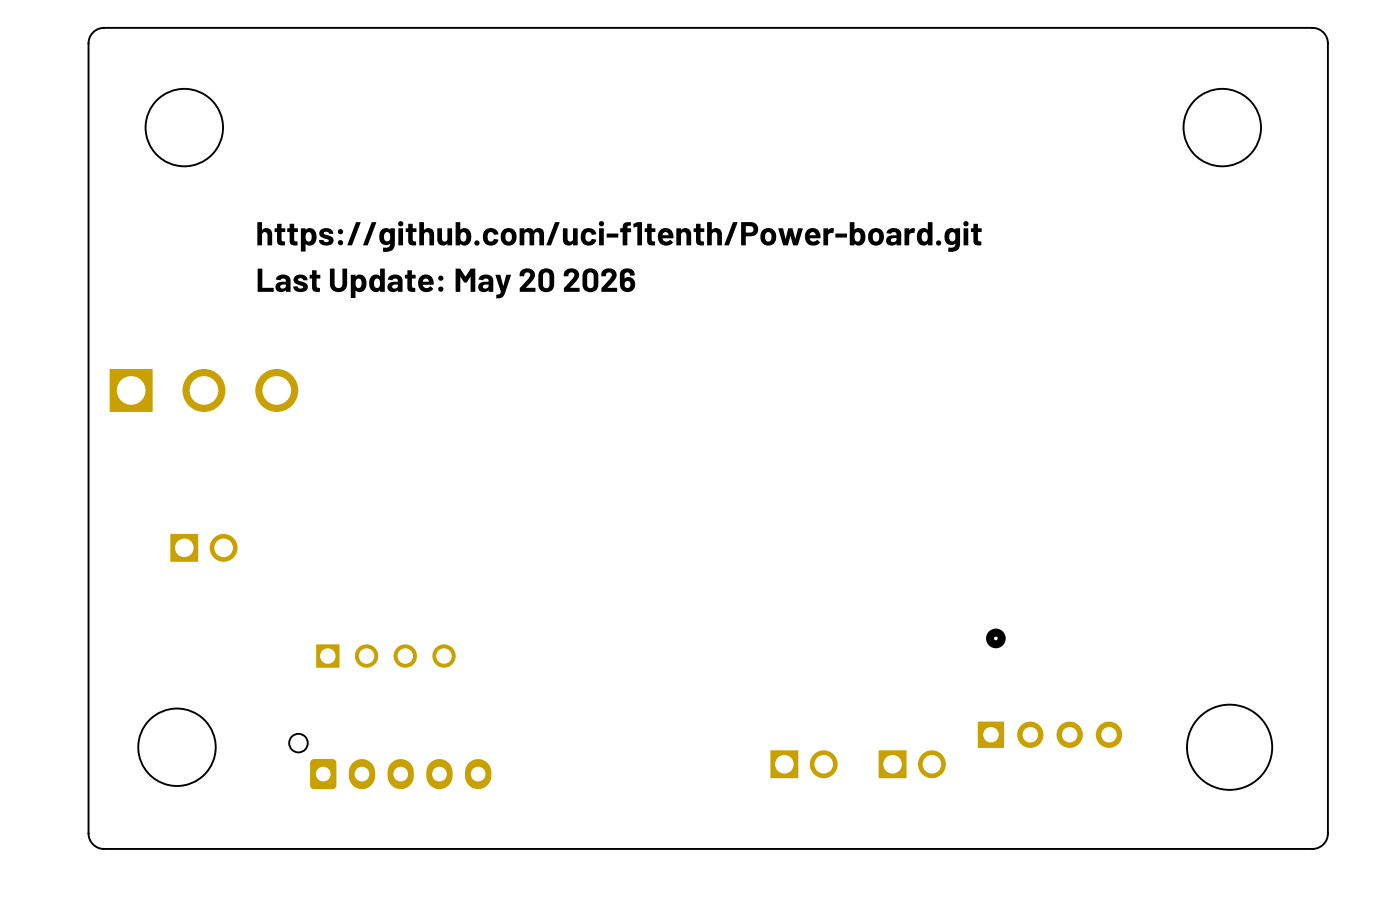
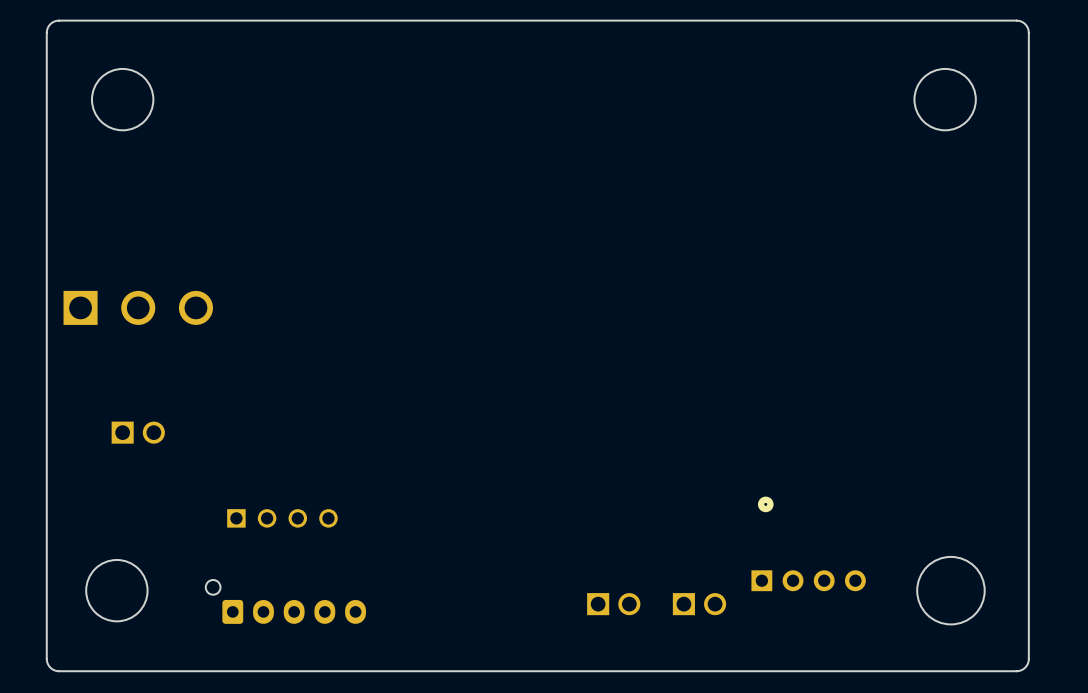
text: https://github.com/uci-f1tenth/Power-board.git (619, 236) -> none
text: Last Update: May 20 2026 (446, 283) -> none

